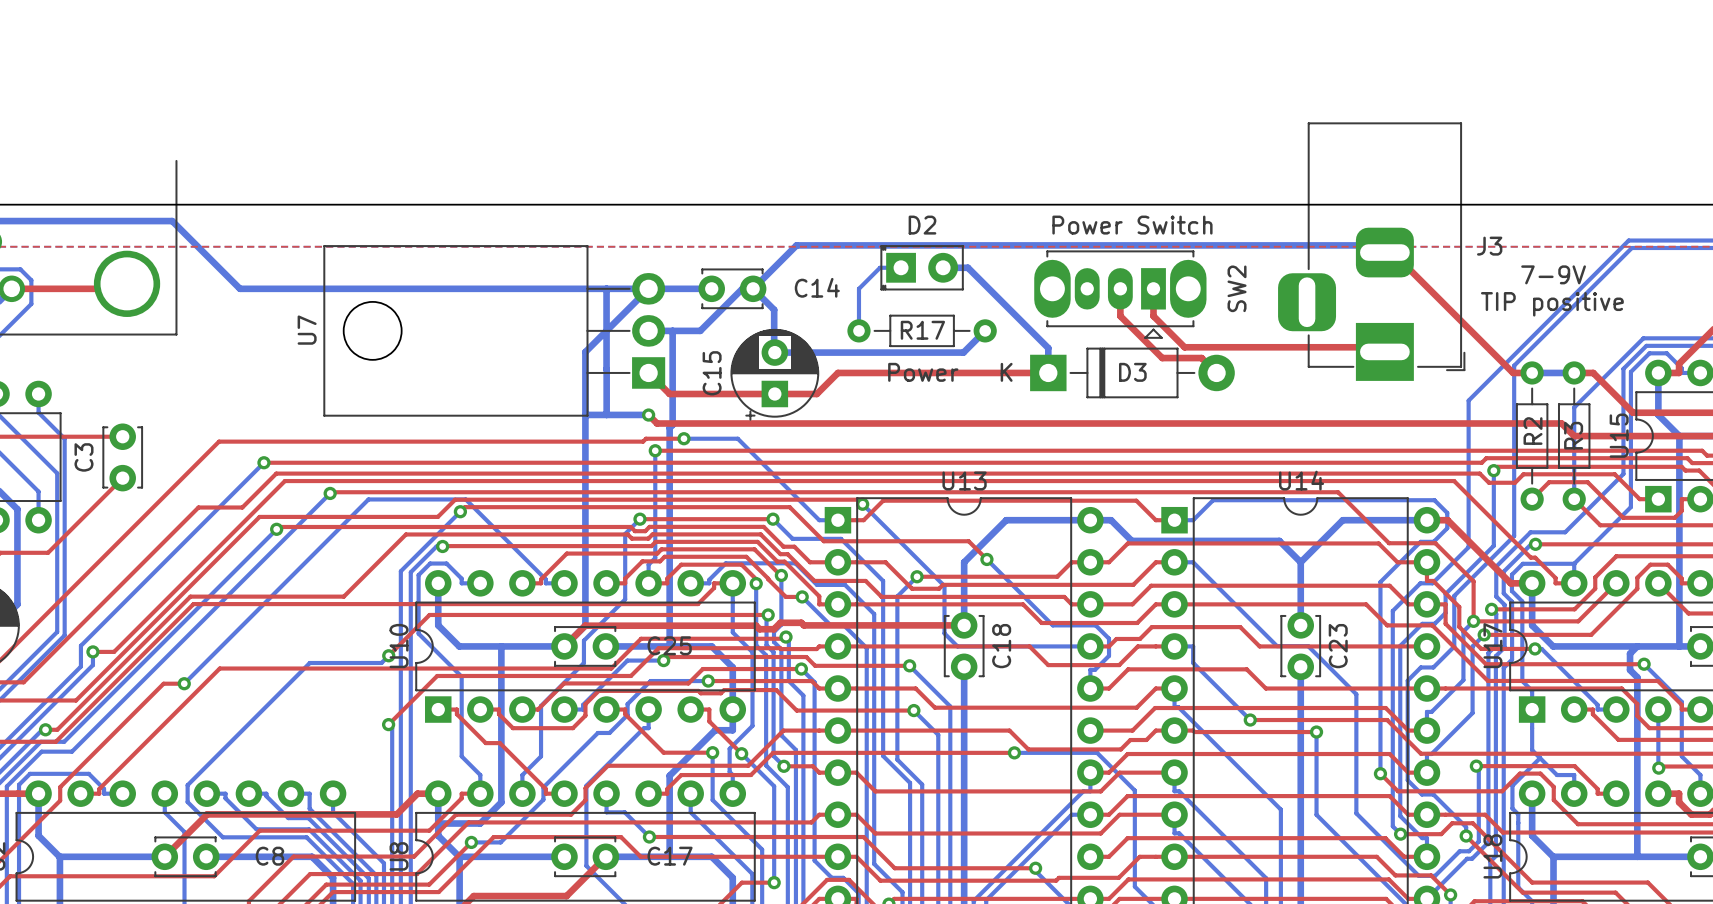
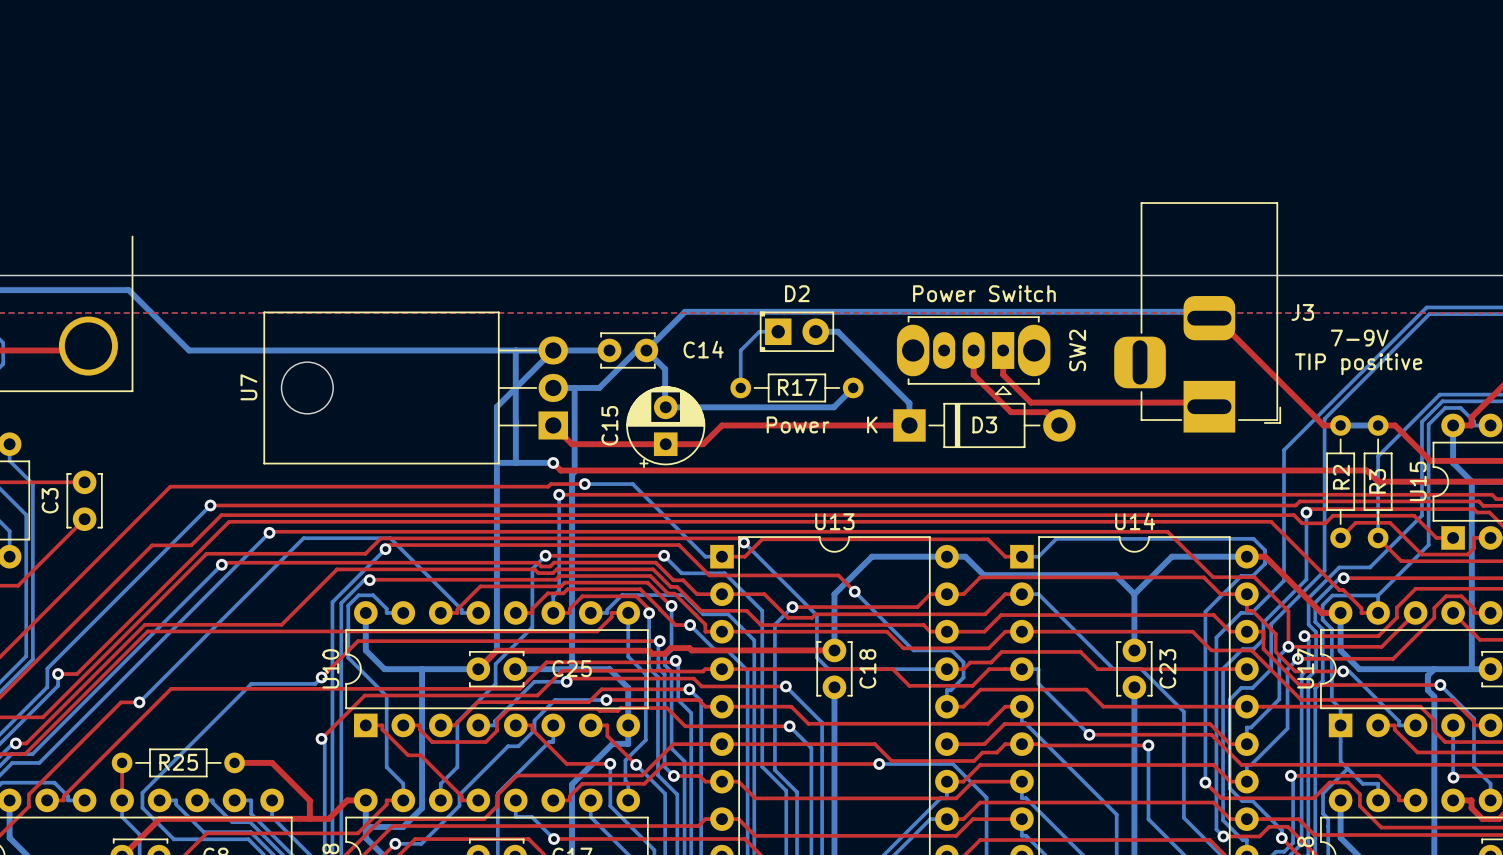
top track: none -> (122, 762) (122, 800)
R25: none -> (178, 762)
top track: none -> (234, 762) (272, 762) (309, 800) (309, 818)

